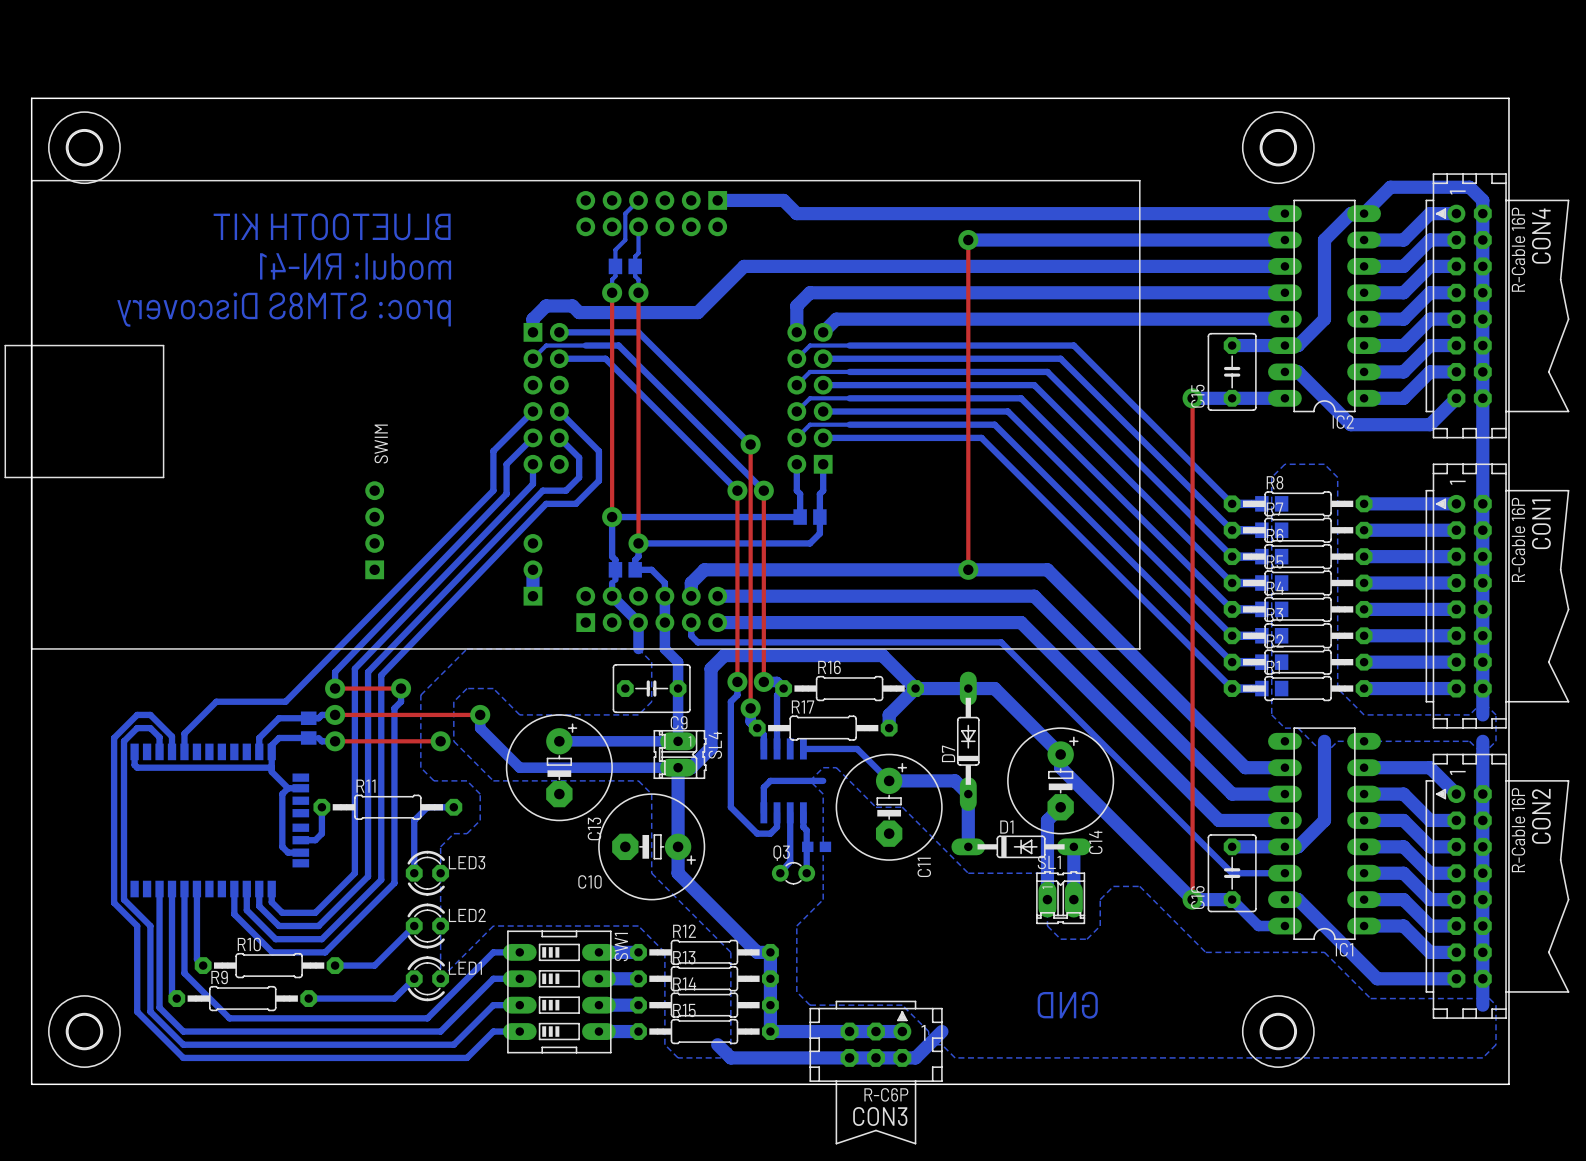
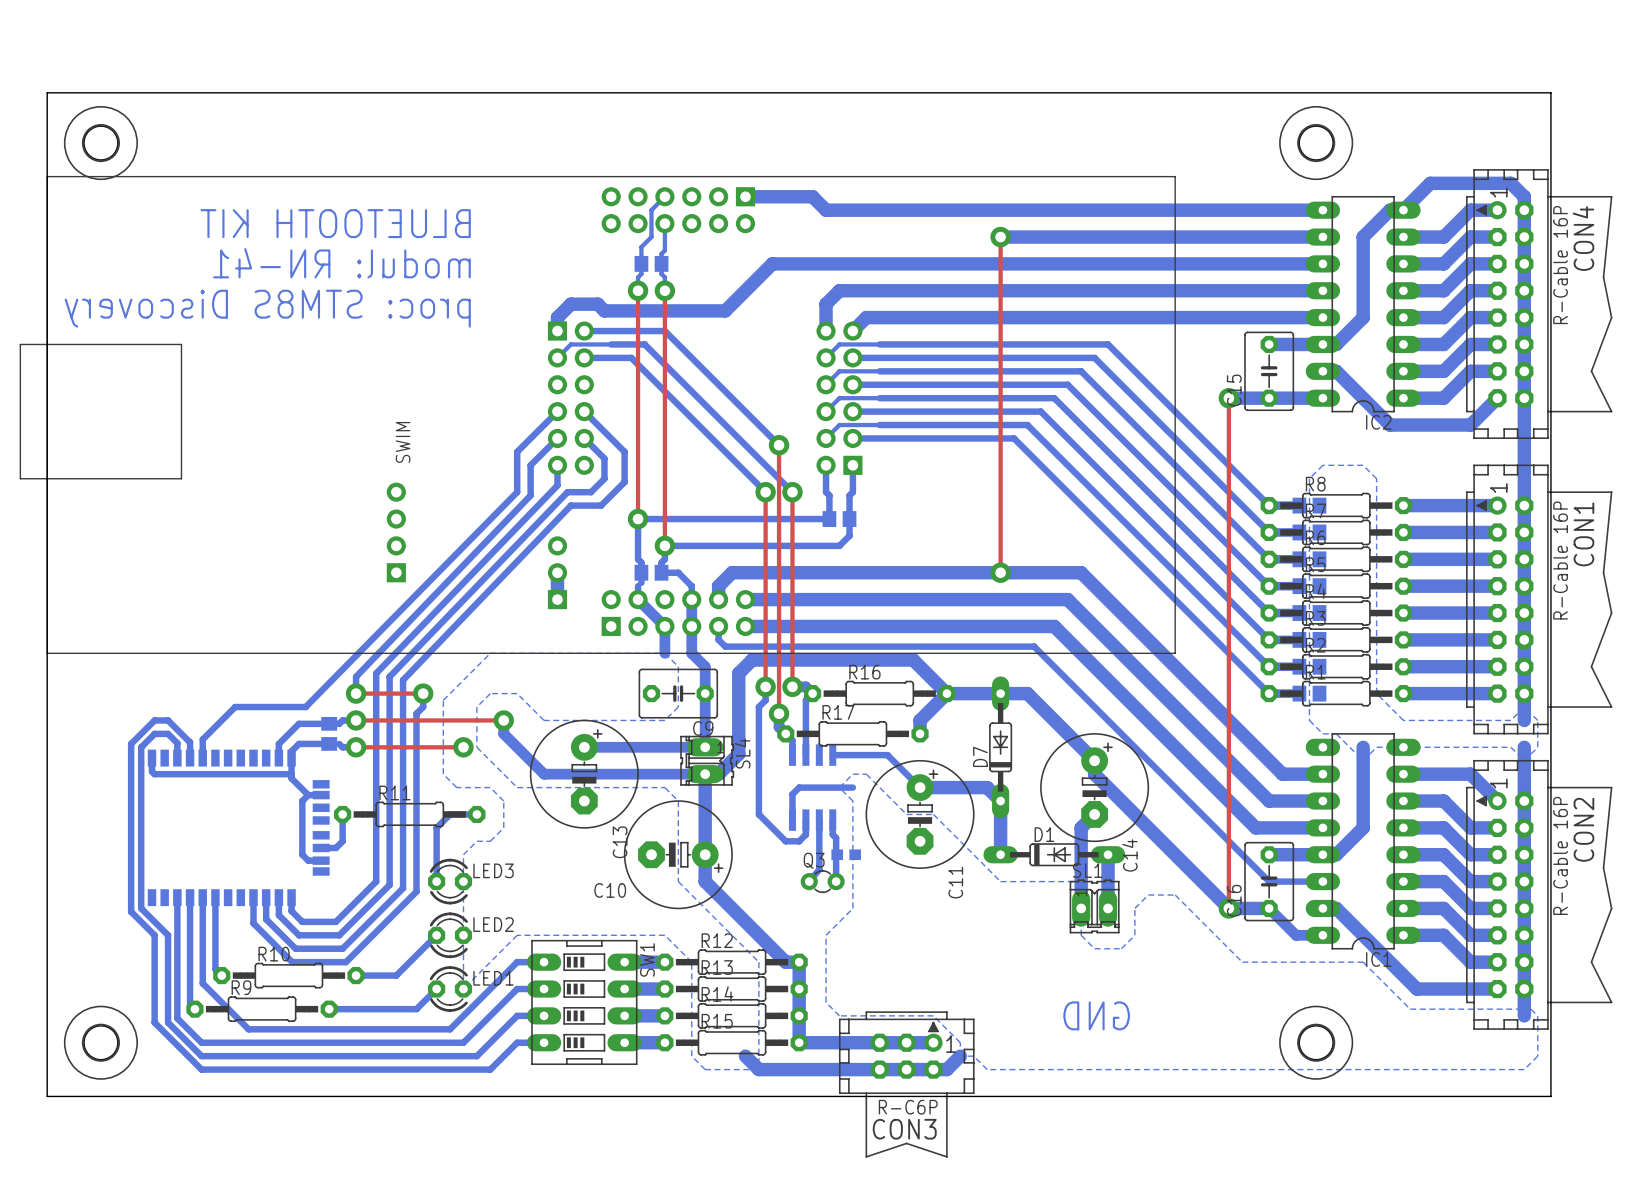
bottom track: (941, 1031) (928, 1044) -> none

